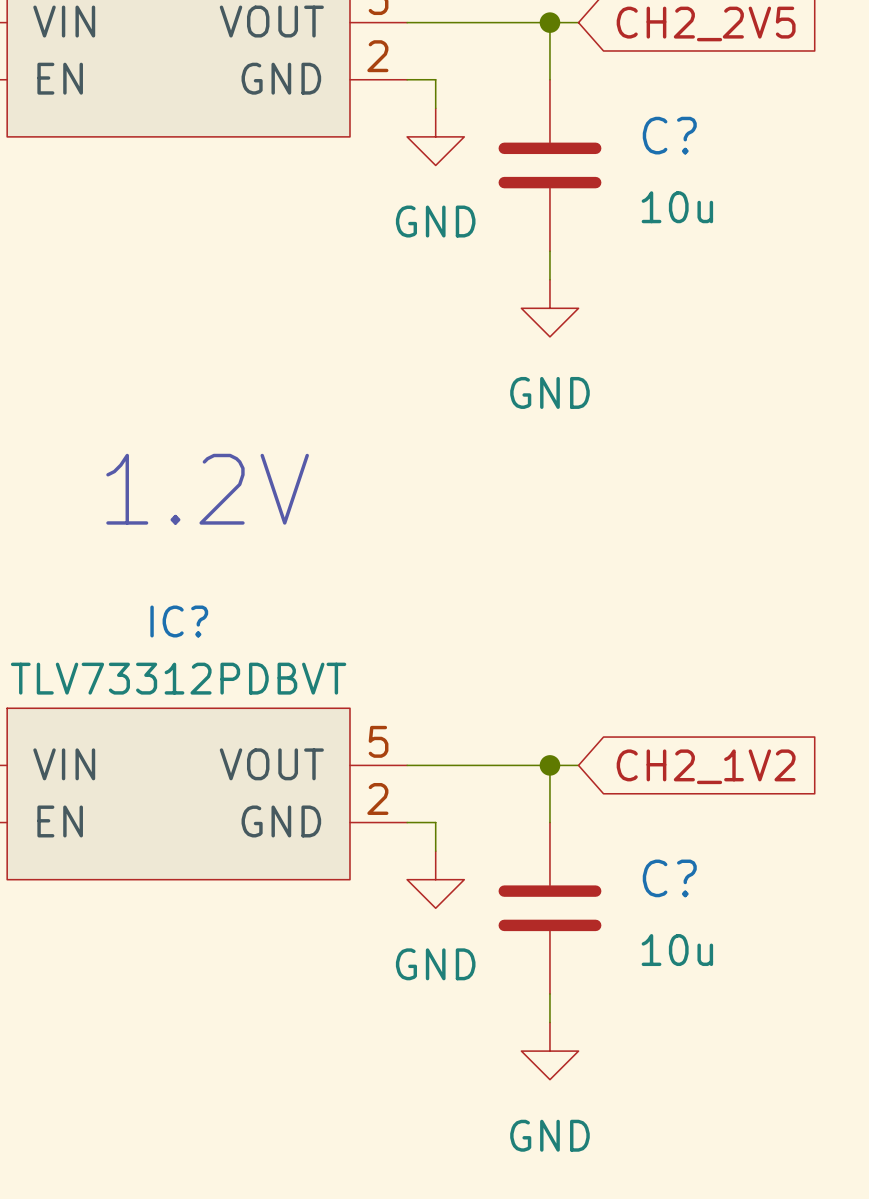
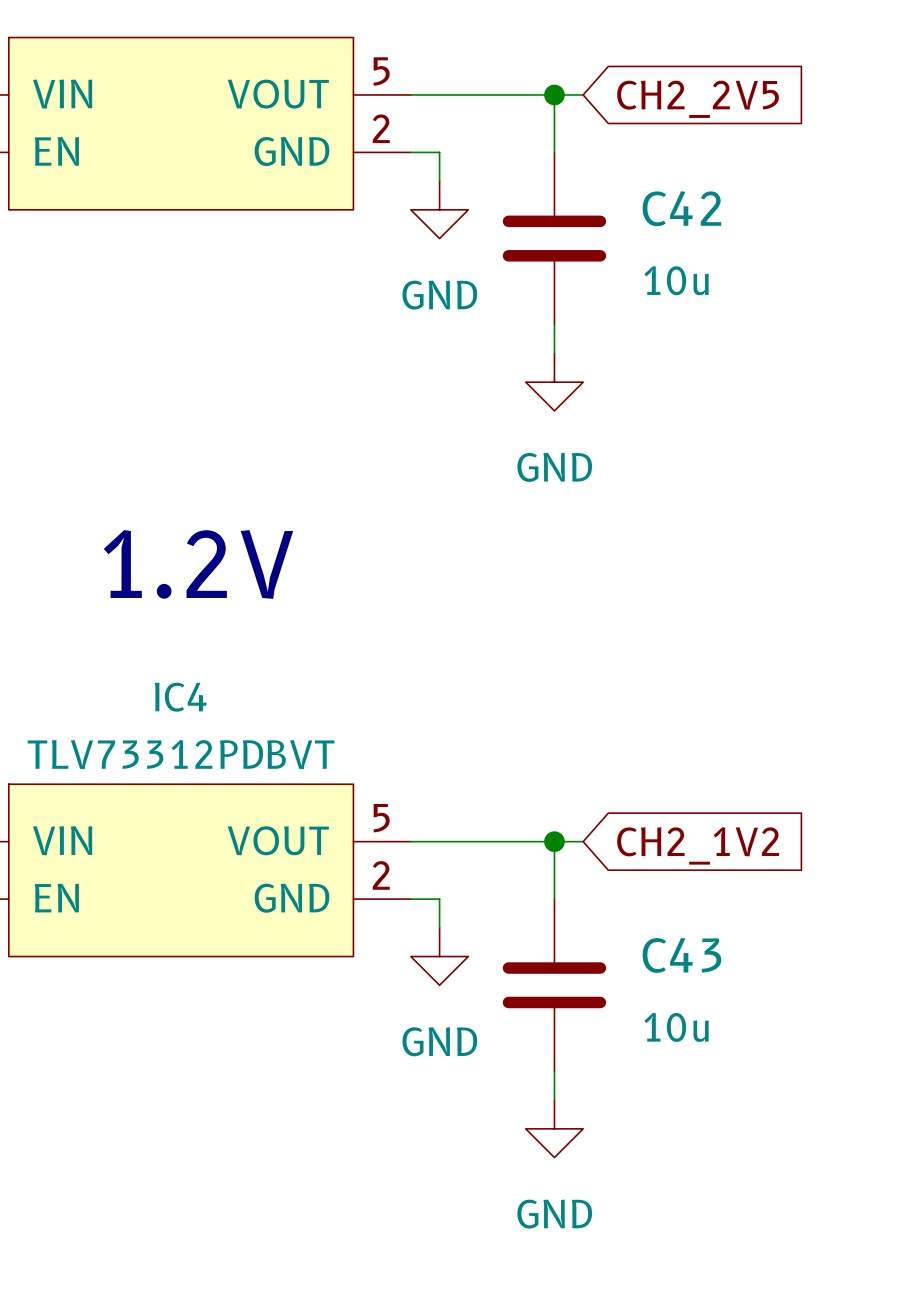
C? name: C? (669, 135) -> C42 (681, 208)
IC? name: IC? (179, 621) -> IC4 (180, 697)
C? name: C? (669, 878) -> C43 (681, 955)

